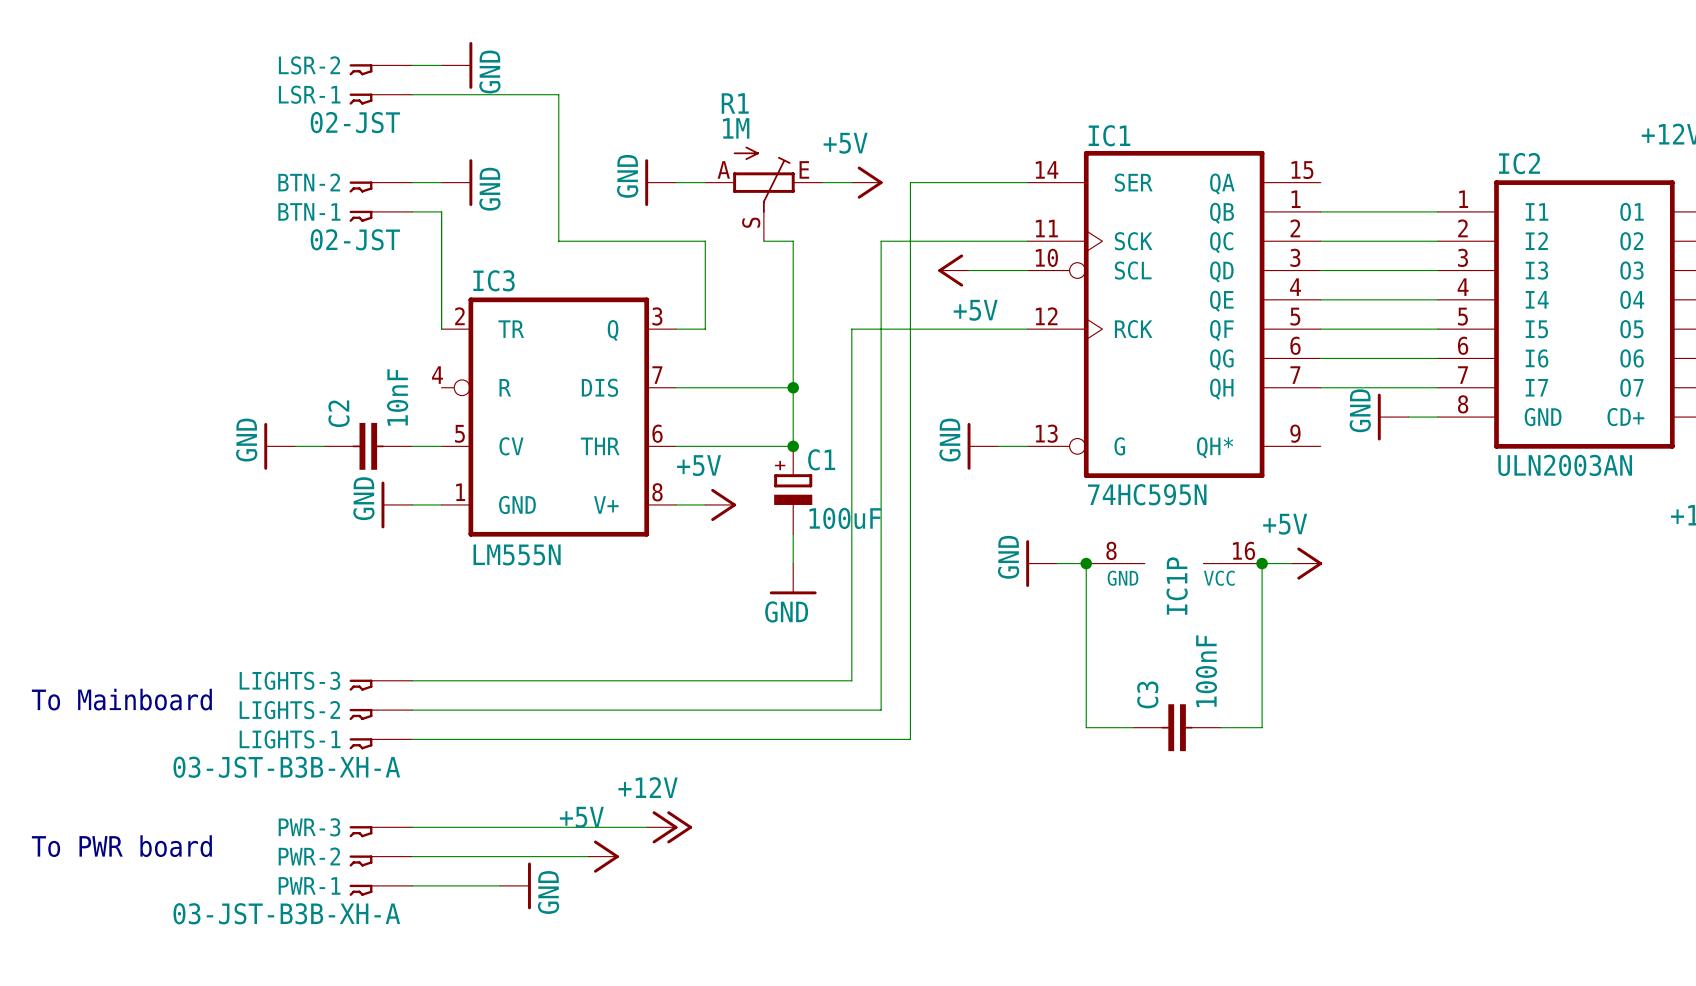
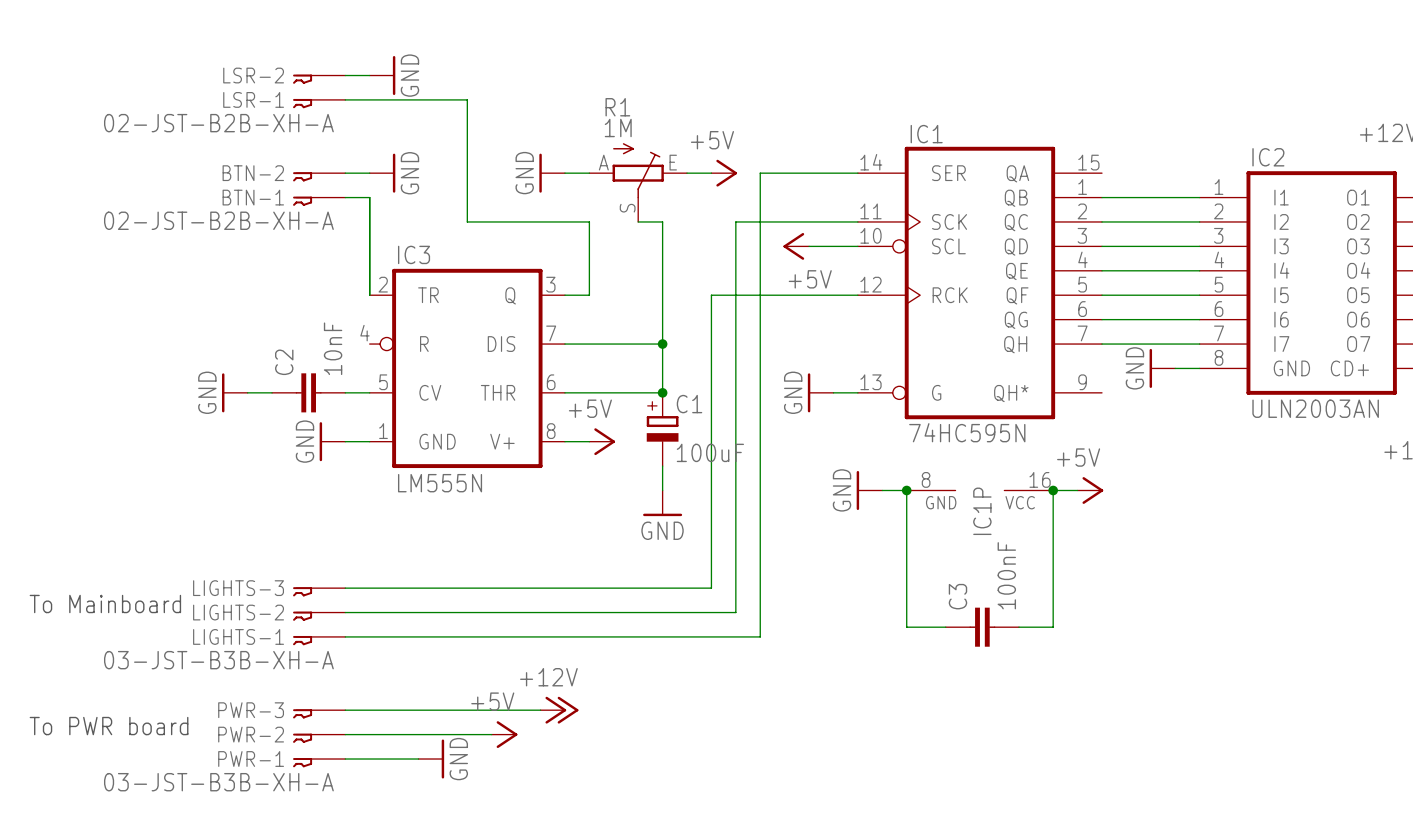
LSR-1 value: 02-JST (355, 122) -> 02-JST-B2B-XH-A (218, 123)
BTN-1 value: 02-JST (355, 239) -> 02-JST-B2B-XH-A (218, 220)

